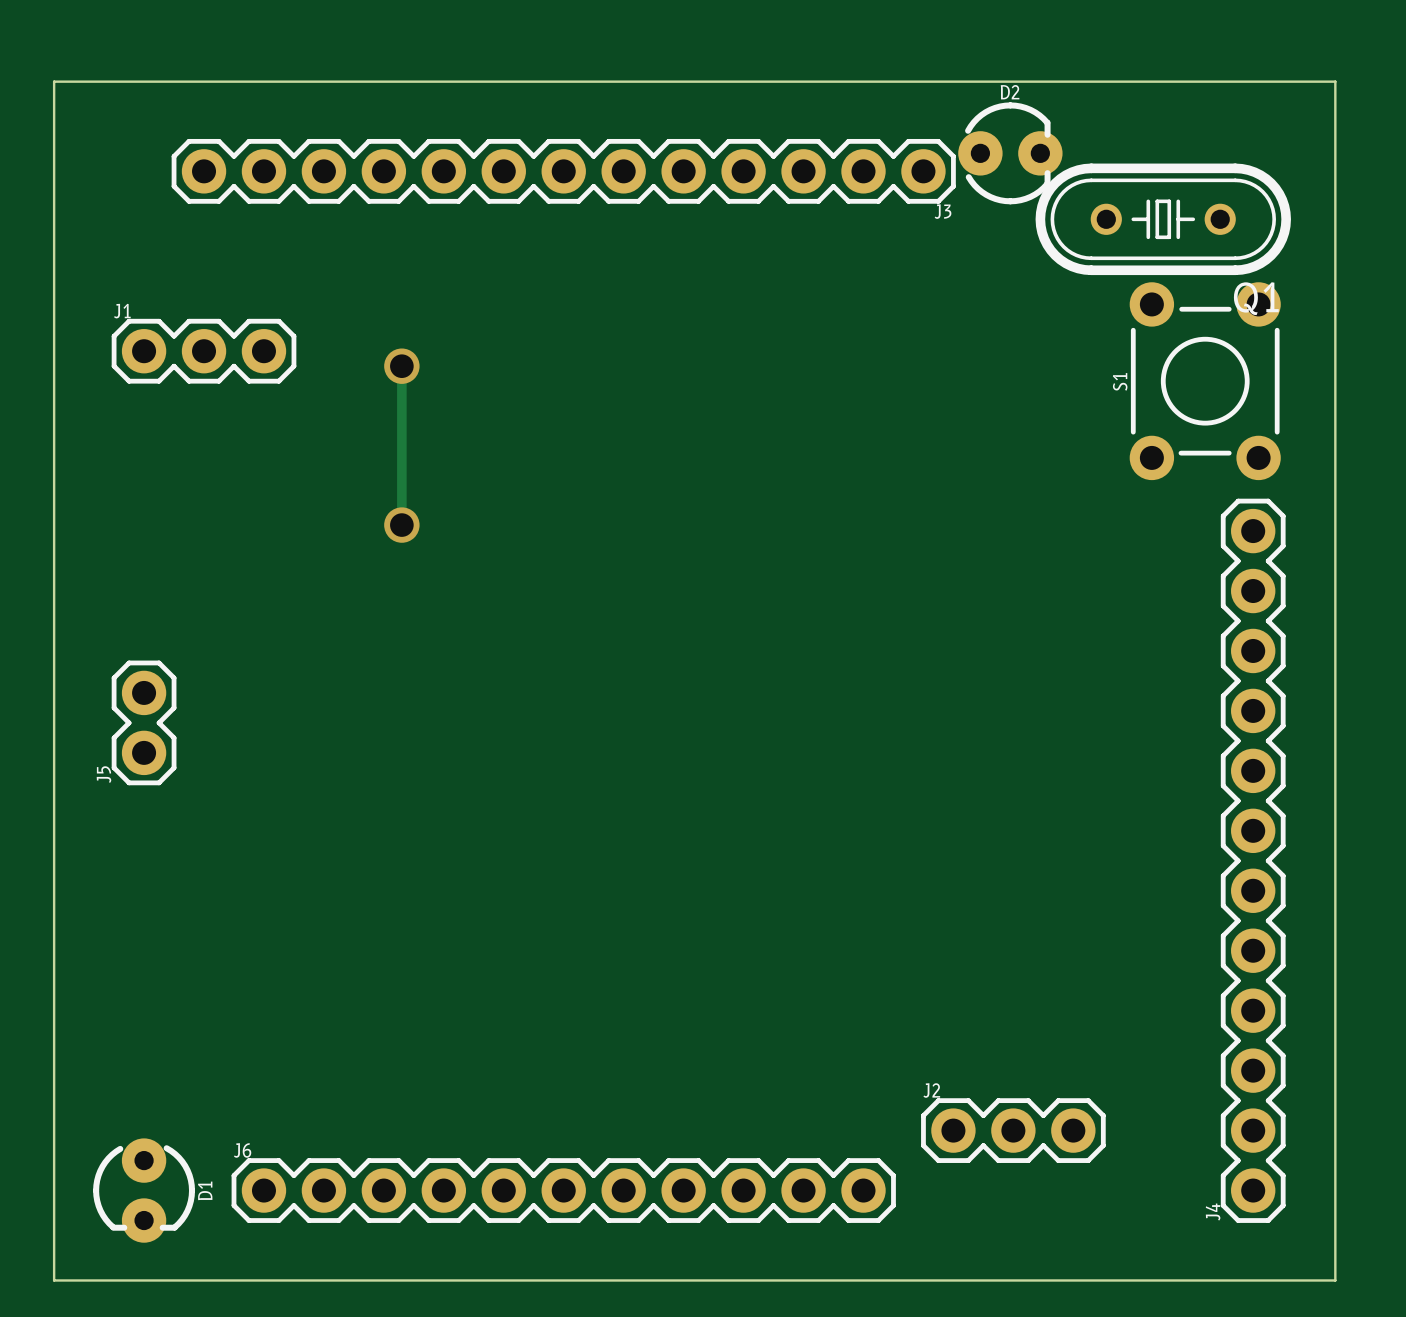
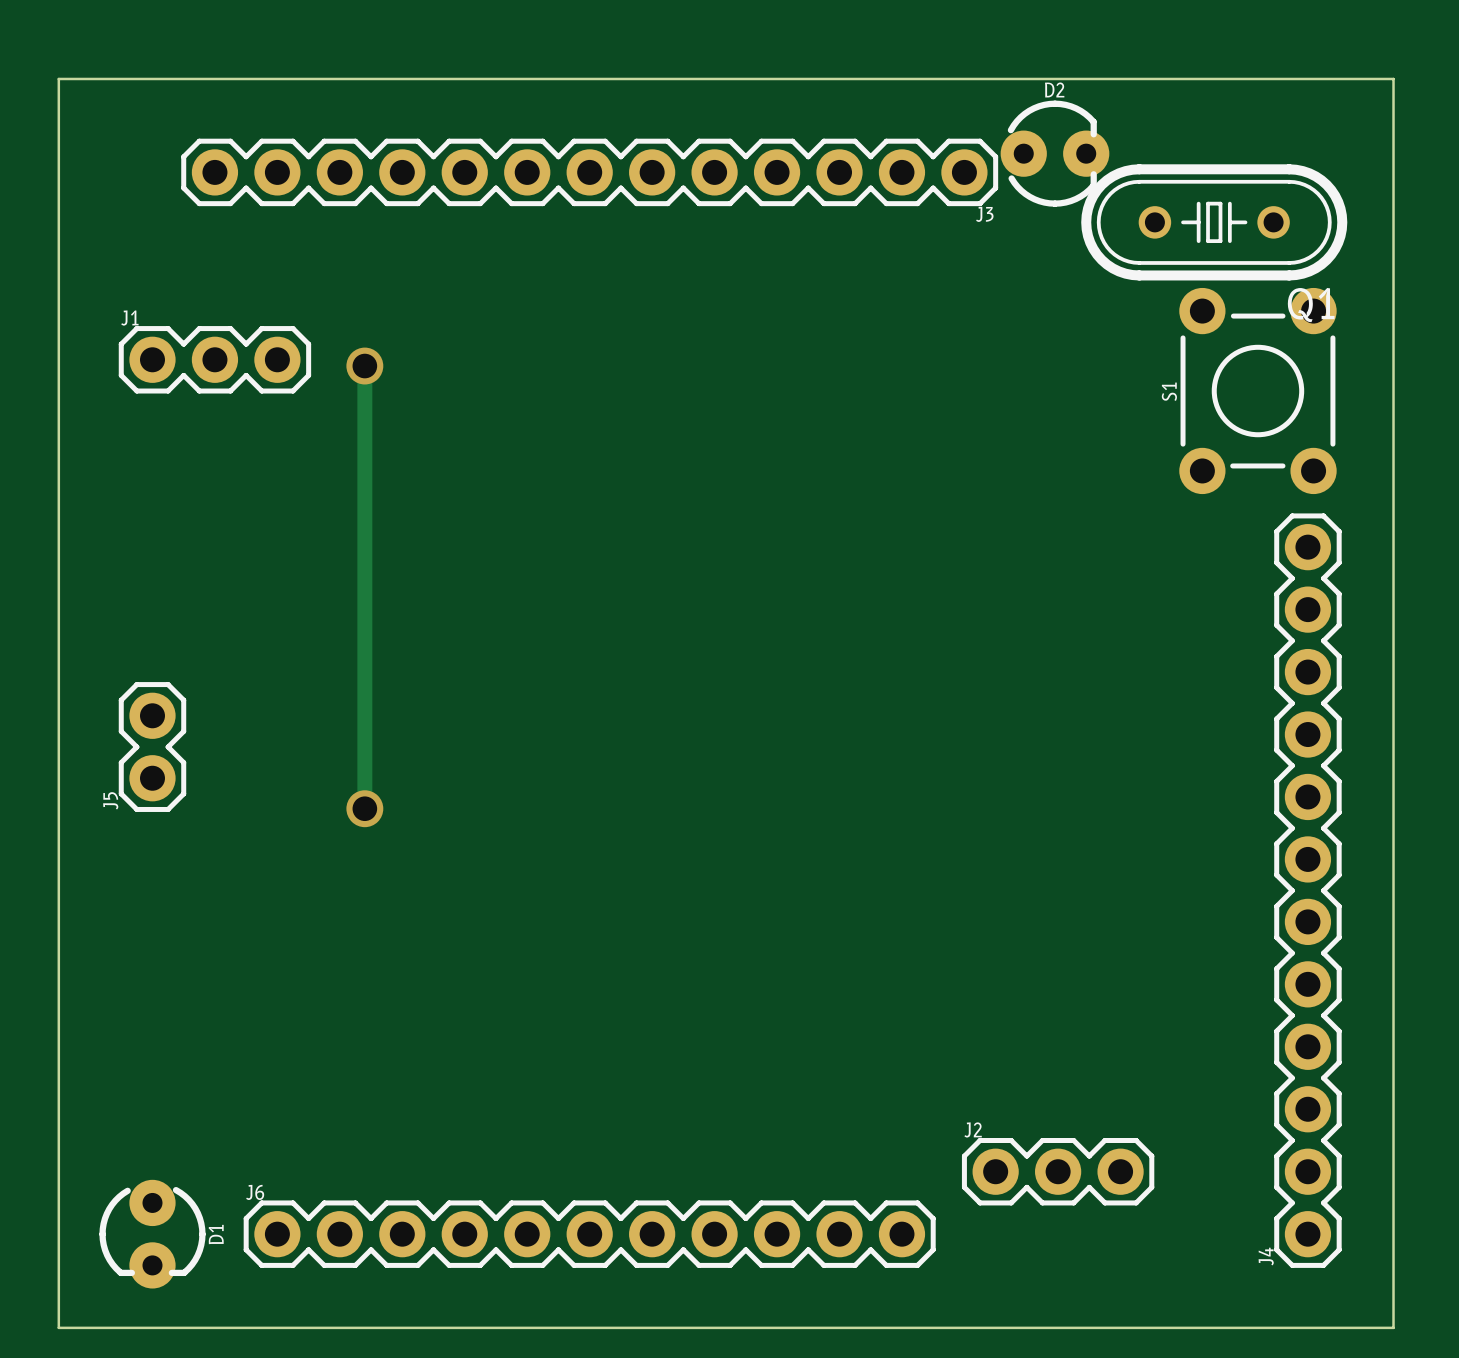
track: none -> (364, 366) (364, 808)
track: (401, 366) (401, 525) -> none
via position: (401, 366) -> (364, 366)
via: (401, 525) -> none
via: none -> (364, 808)

